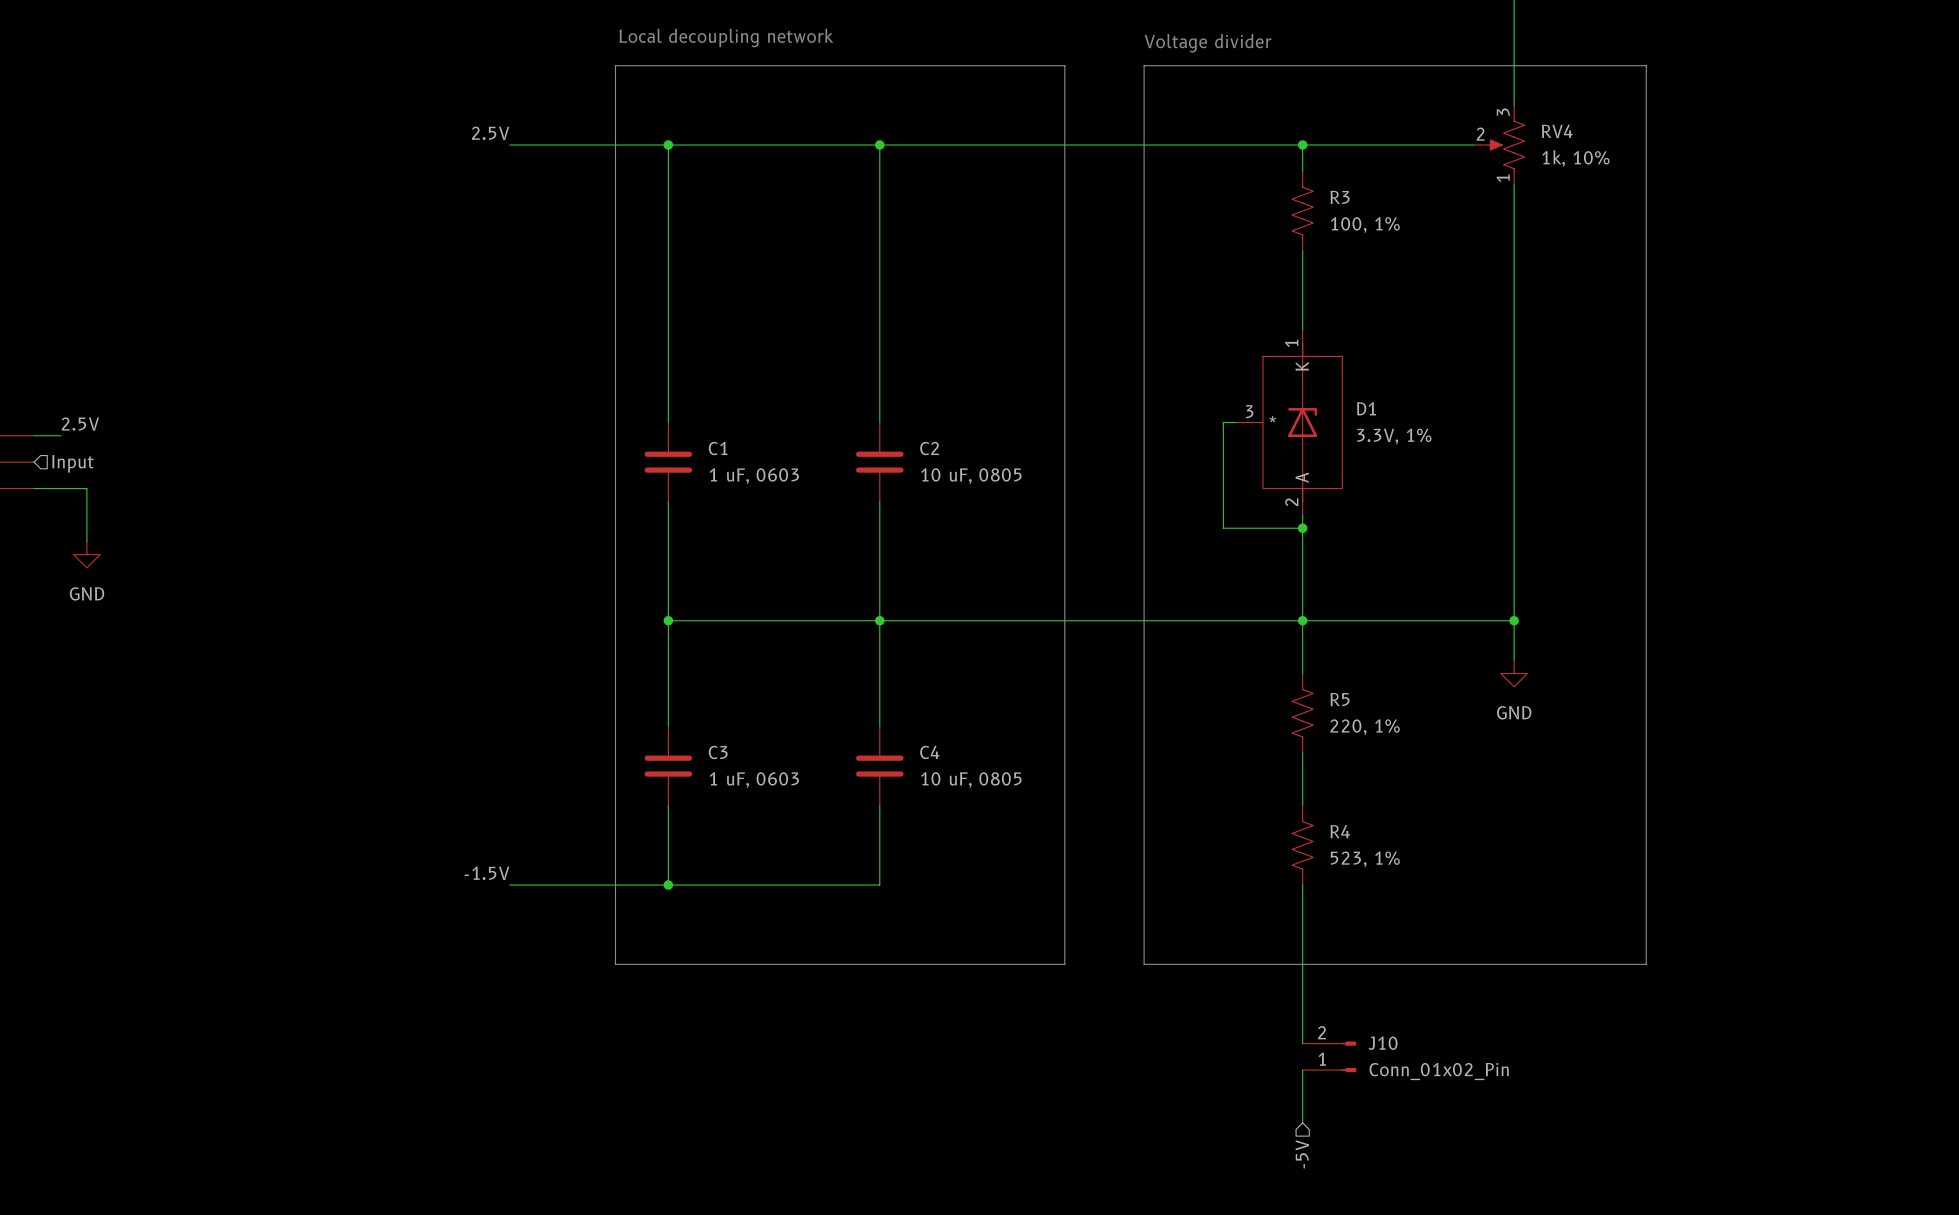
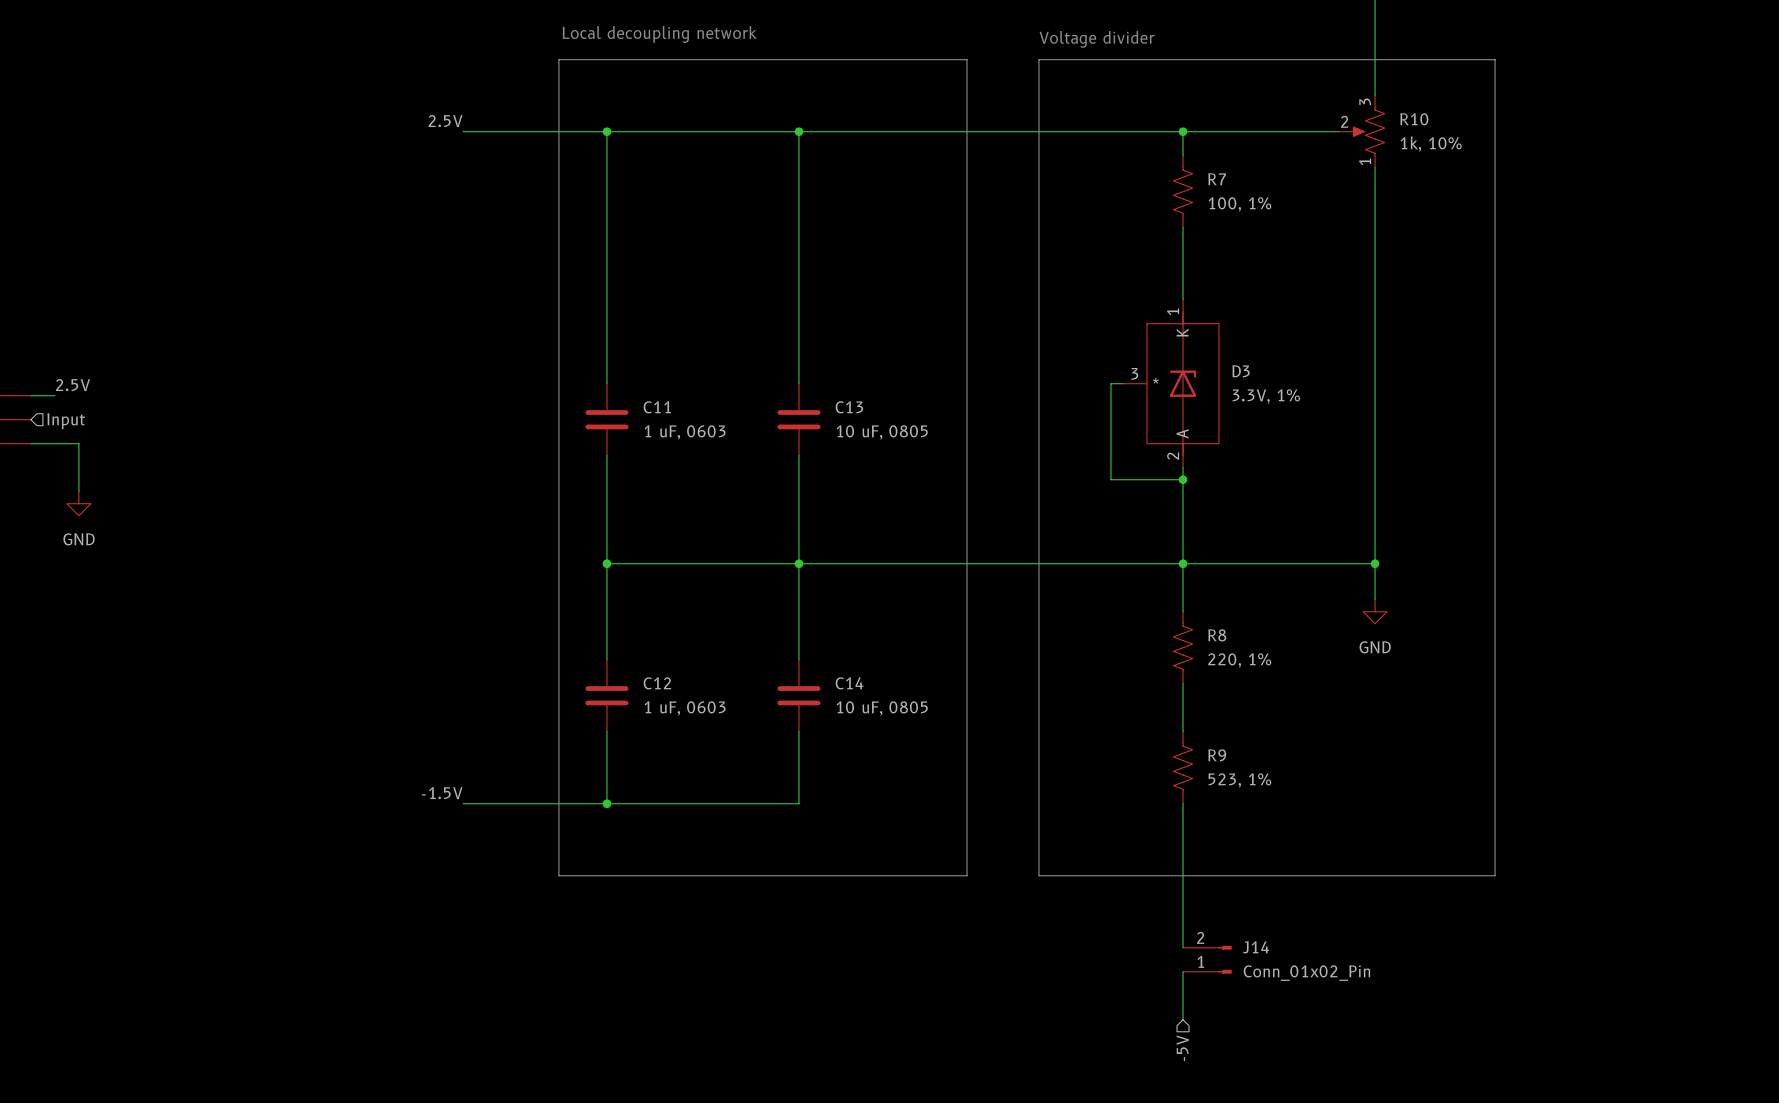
RV4 name: RV4 (1557, 131) -> R10 (1414, 119)
R3 name: R3 (1340, 197) -> R7 (1217, 179)
D1 name: D1 (1366, 408) -> D3 (1241, 371)
C1 name: C1 (718, 448) -> C11 (657, 407)
C2 name: C2 (929, 448) -> C13 (849, 407)
R5 name: R5 (1339, 699) -> R8 (1217, 635)
C3 name: C3 (718, 752) -> C12 (657, 683)
C4 name: C4 (929, 752) -> C14 (849, 683)
R4 name: R4 (1340, 831) -> R9 (1217, 755)
J10 name: J10 (1383, 1043) -> J14 (1256, 947)

